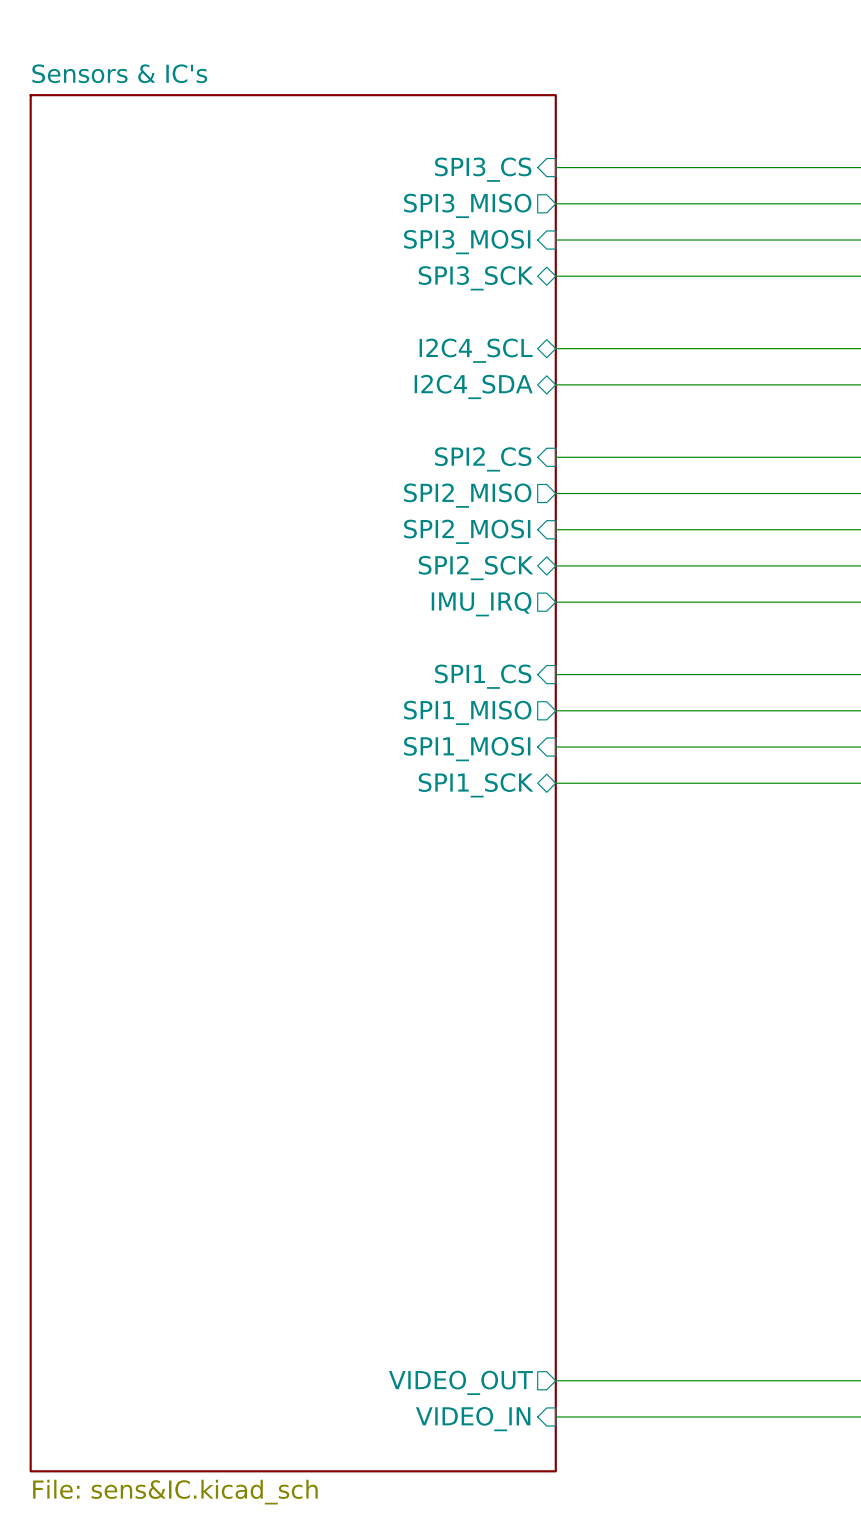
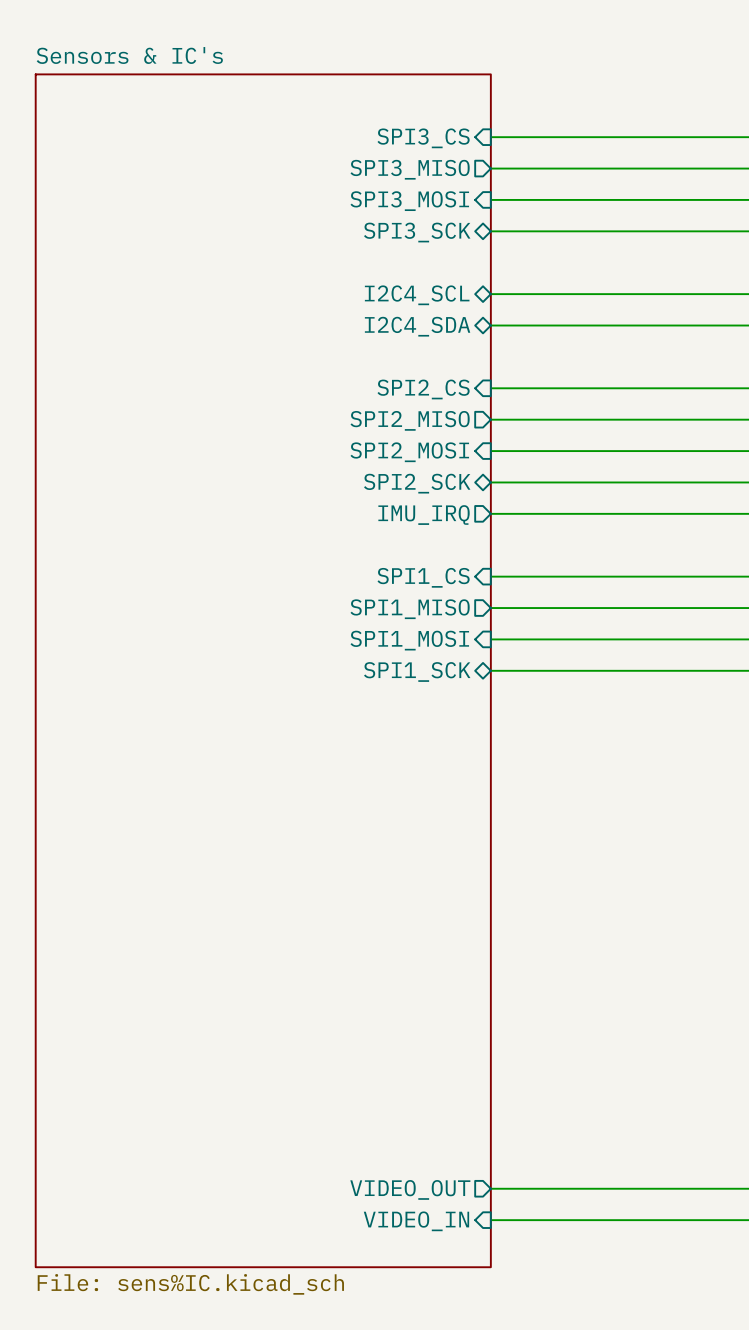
sheet Sensors & IC's value: File: sens&IC.kicad_sch (175, 1492) -> File: sens%IC.kicad_sch (190, 1284)

